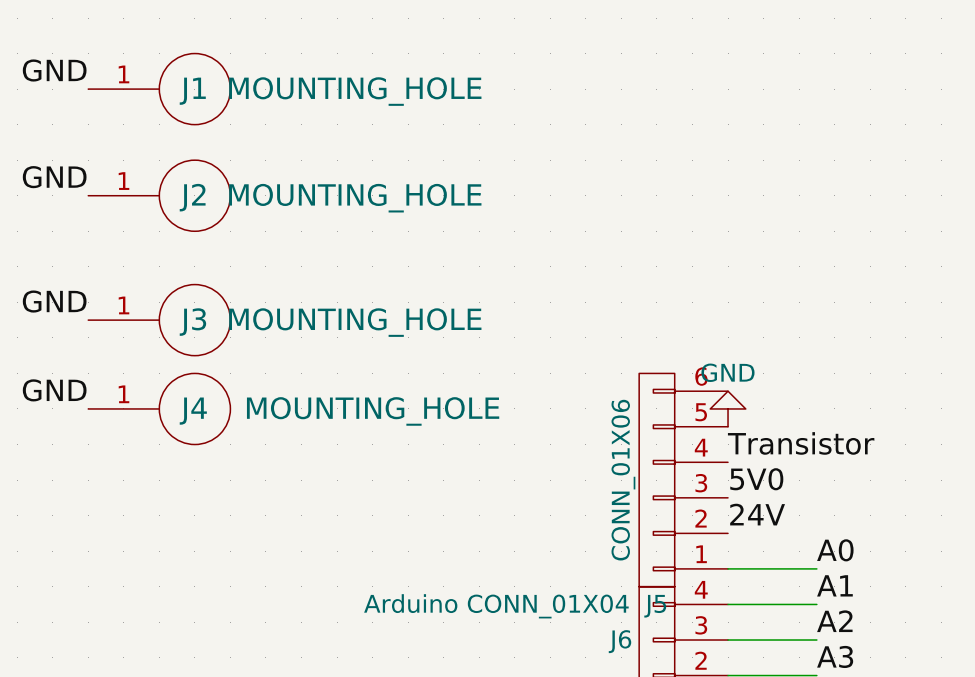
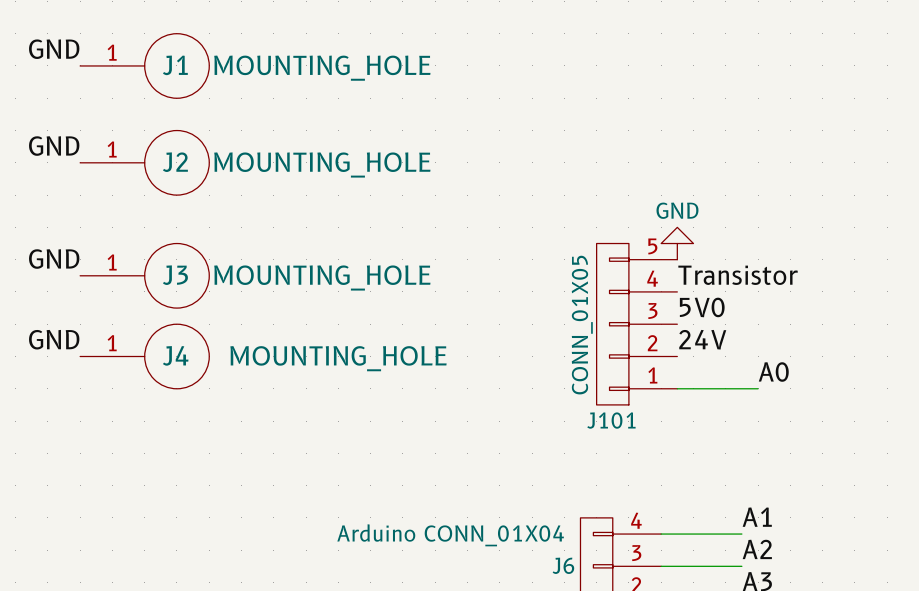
J101: none -> CONN_01X05 (636, 324)
power symbol position: GND (728, 408) -> GND (677, 243)
label position: Transistor (801, 443) -> Transistor (738, 275)
label position: 5V0 (756, 479) -> 5V0 (702, 307)
J5: CONN_01X06 (683, 480) -> none
label position: 24V (757, 514) -> 24V (702, 339)
label position: A0 (835, 550) -> A0 (773, 371)
wire: (728, 568) (816, 568) -> (677, 388) (758, 388)

